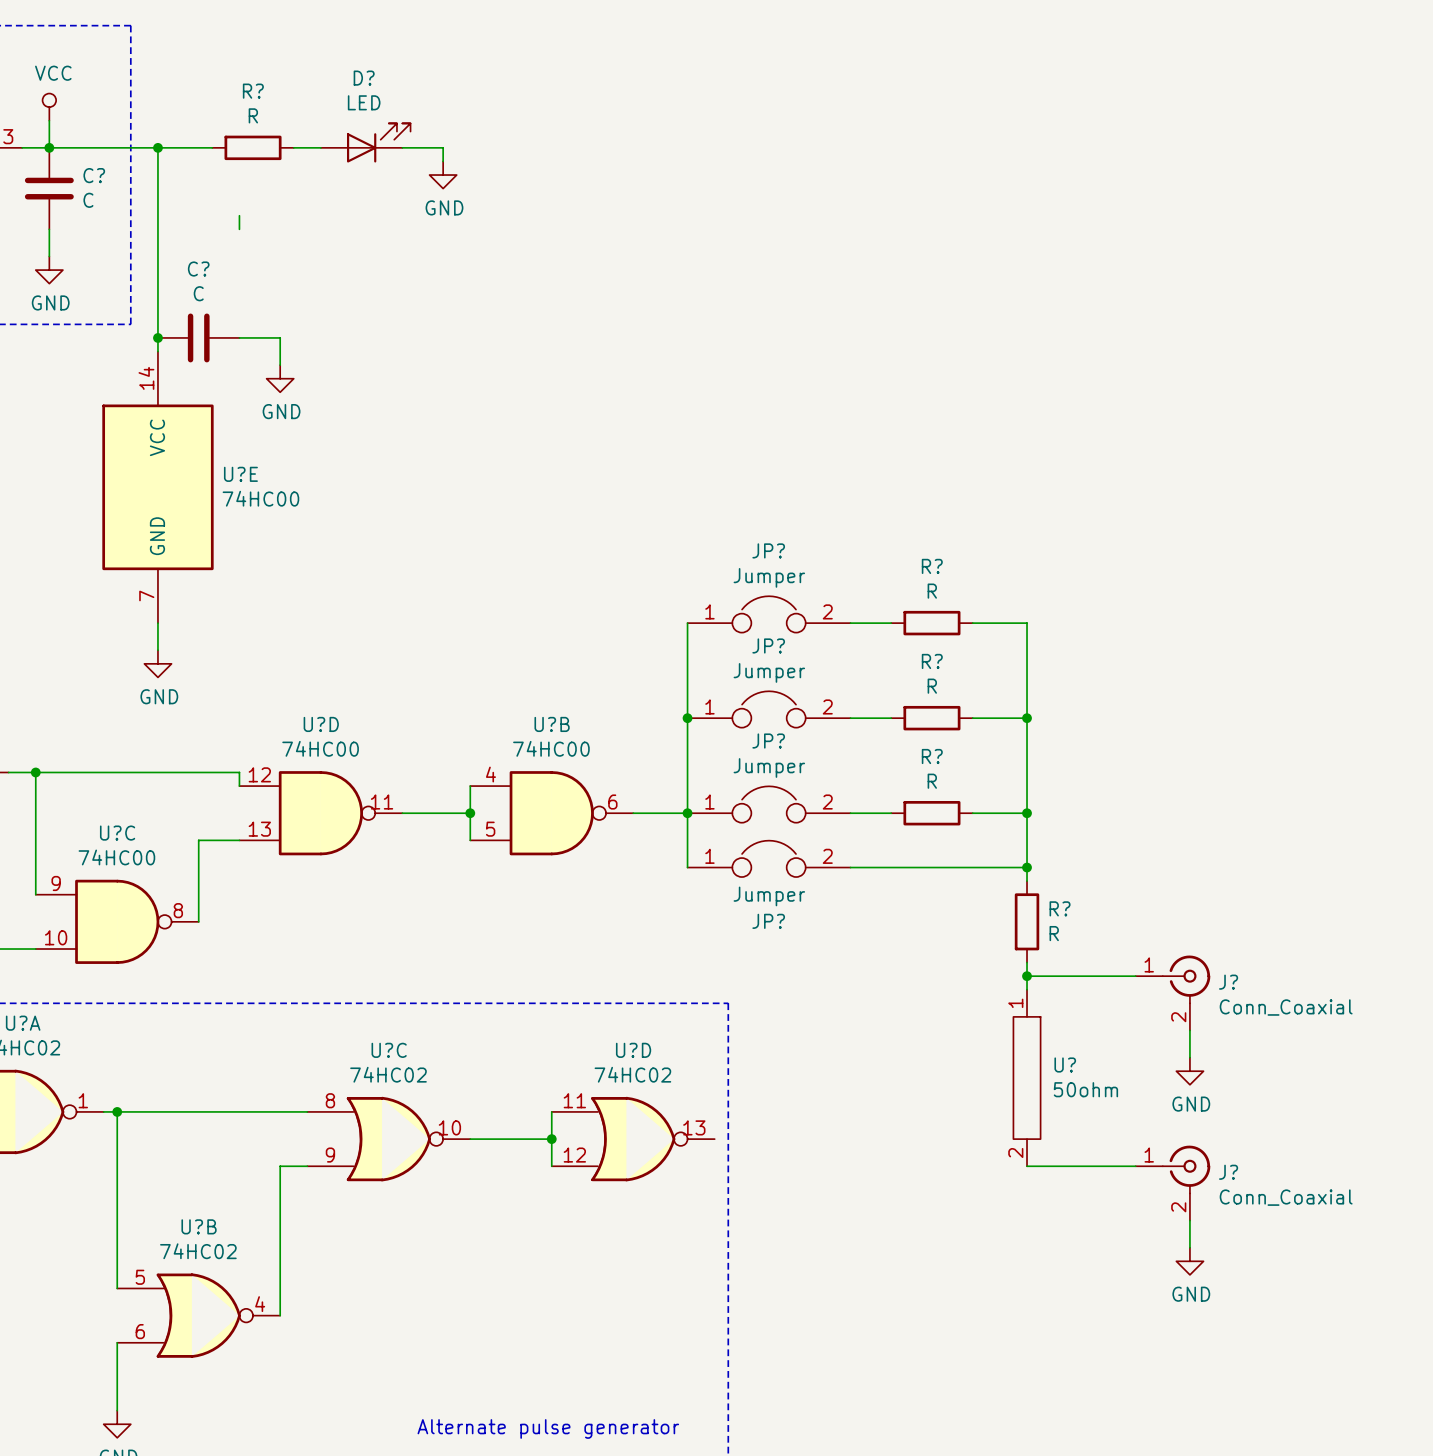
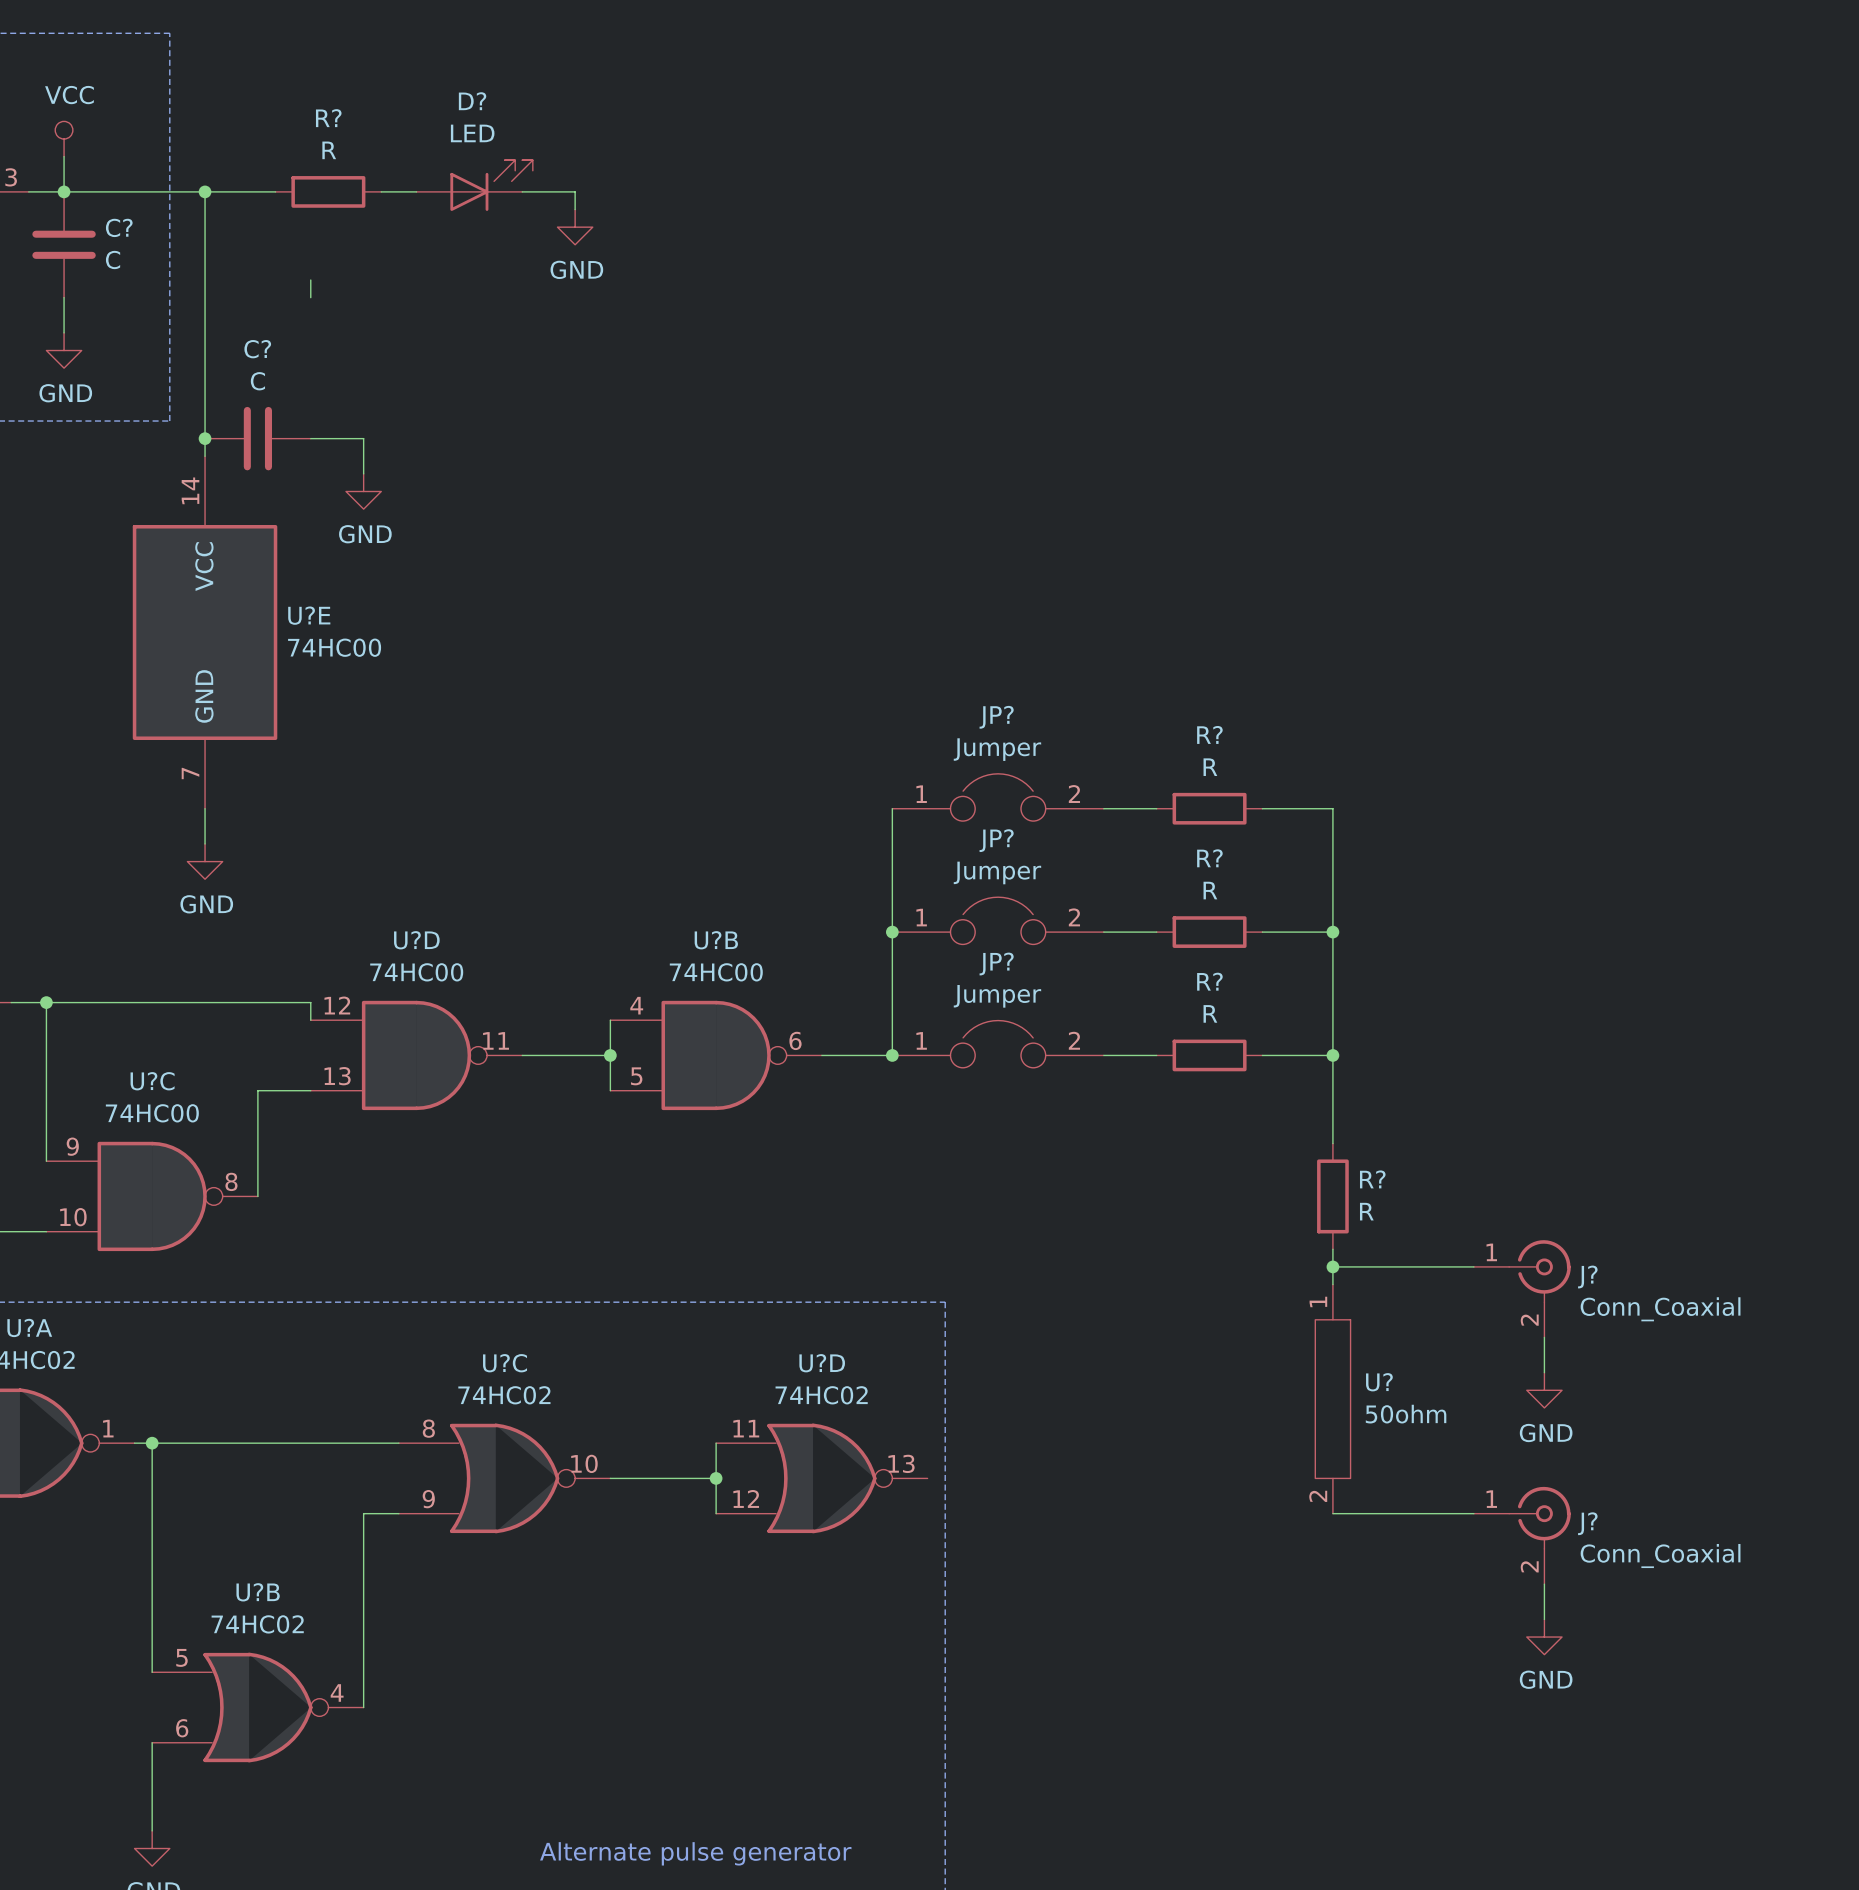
wire: (687, 813) (687, 867) -> none
JP?: Jumper (769, 858) -> none
wire: (850, 867) (1027, 867) -> none
junction: (1027, 867) -> none

